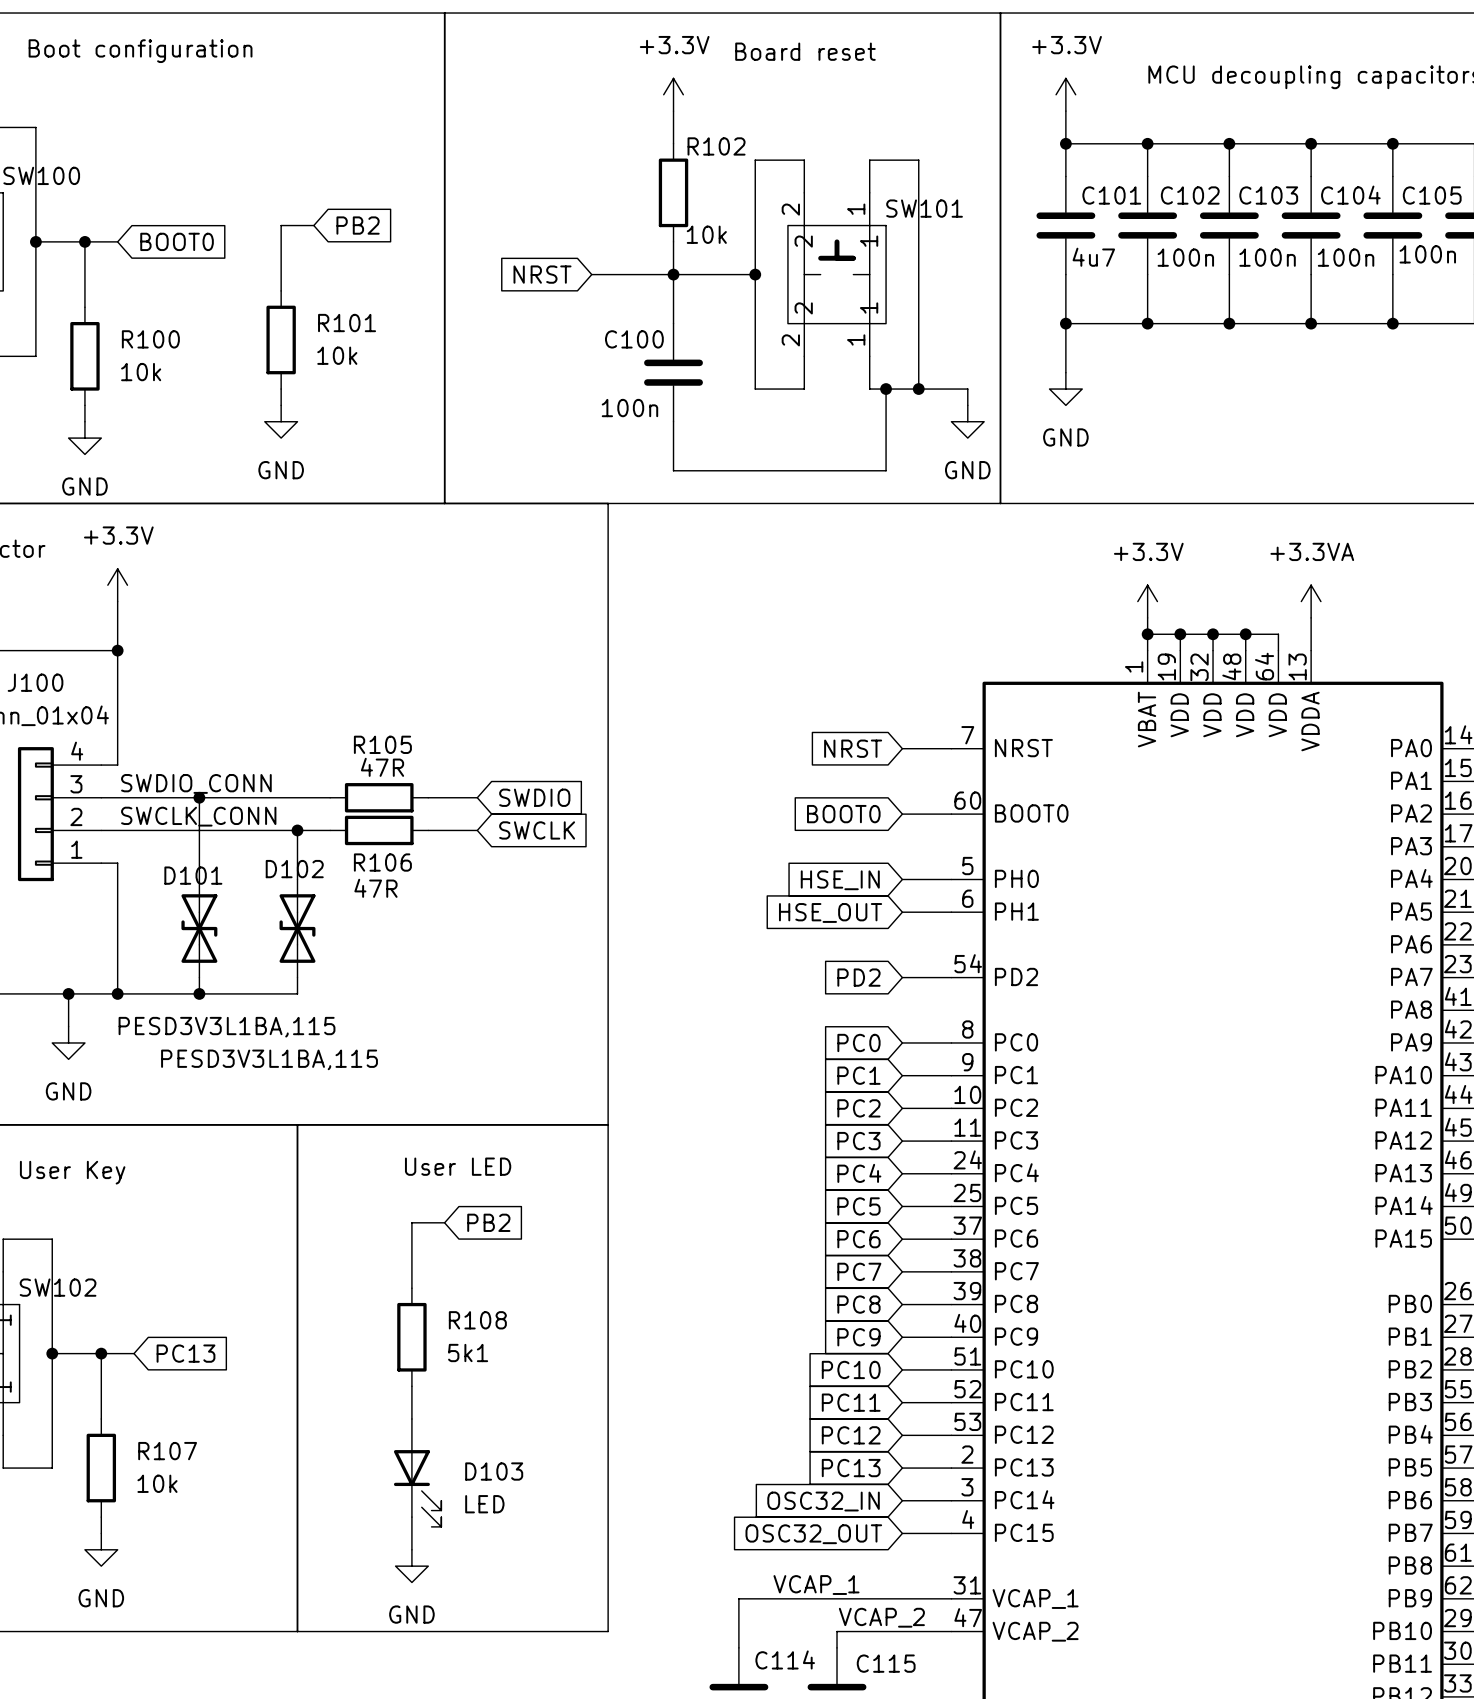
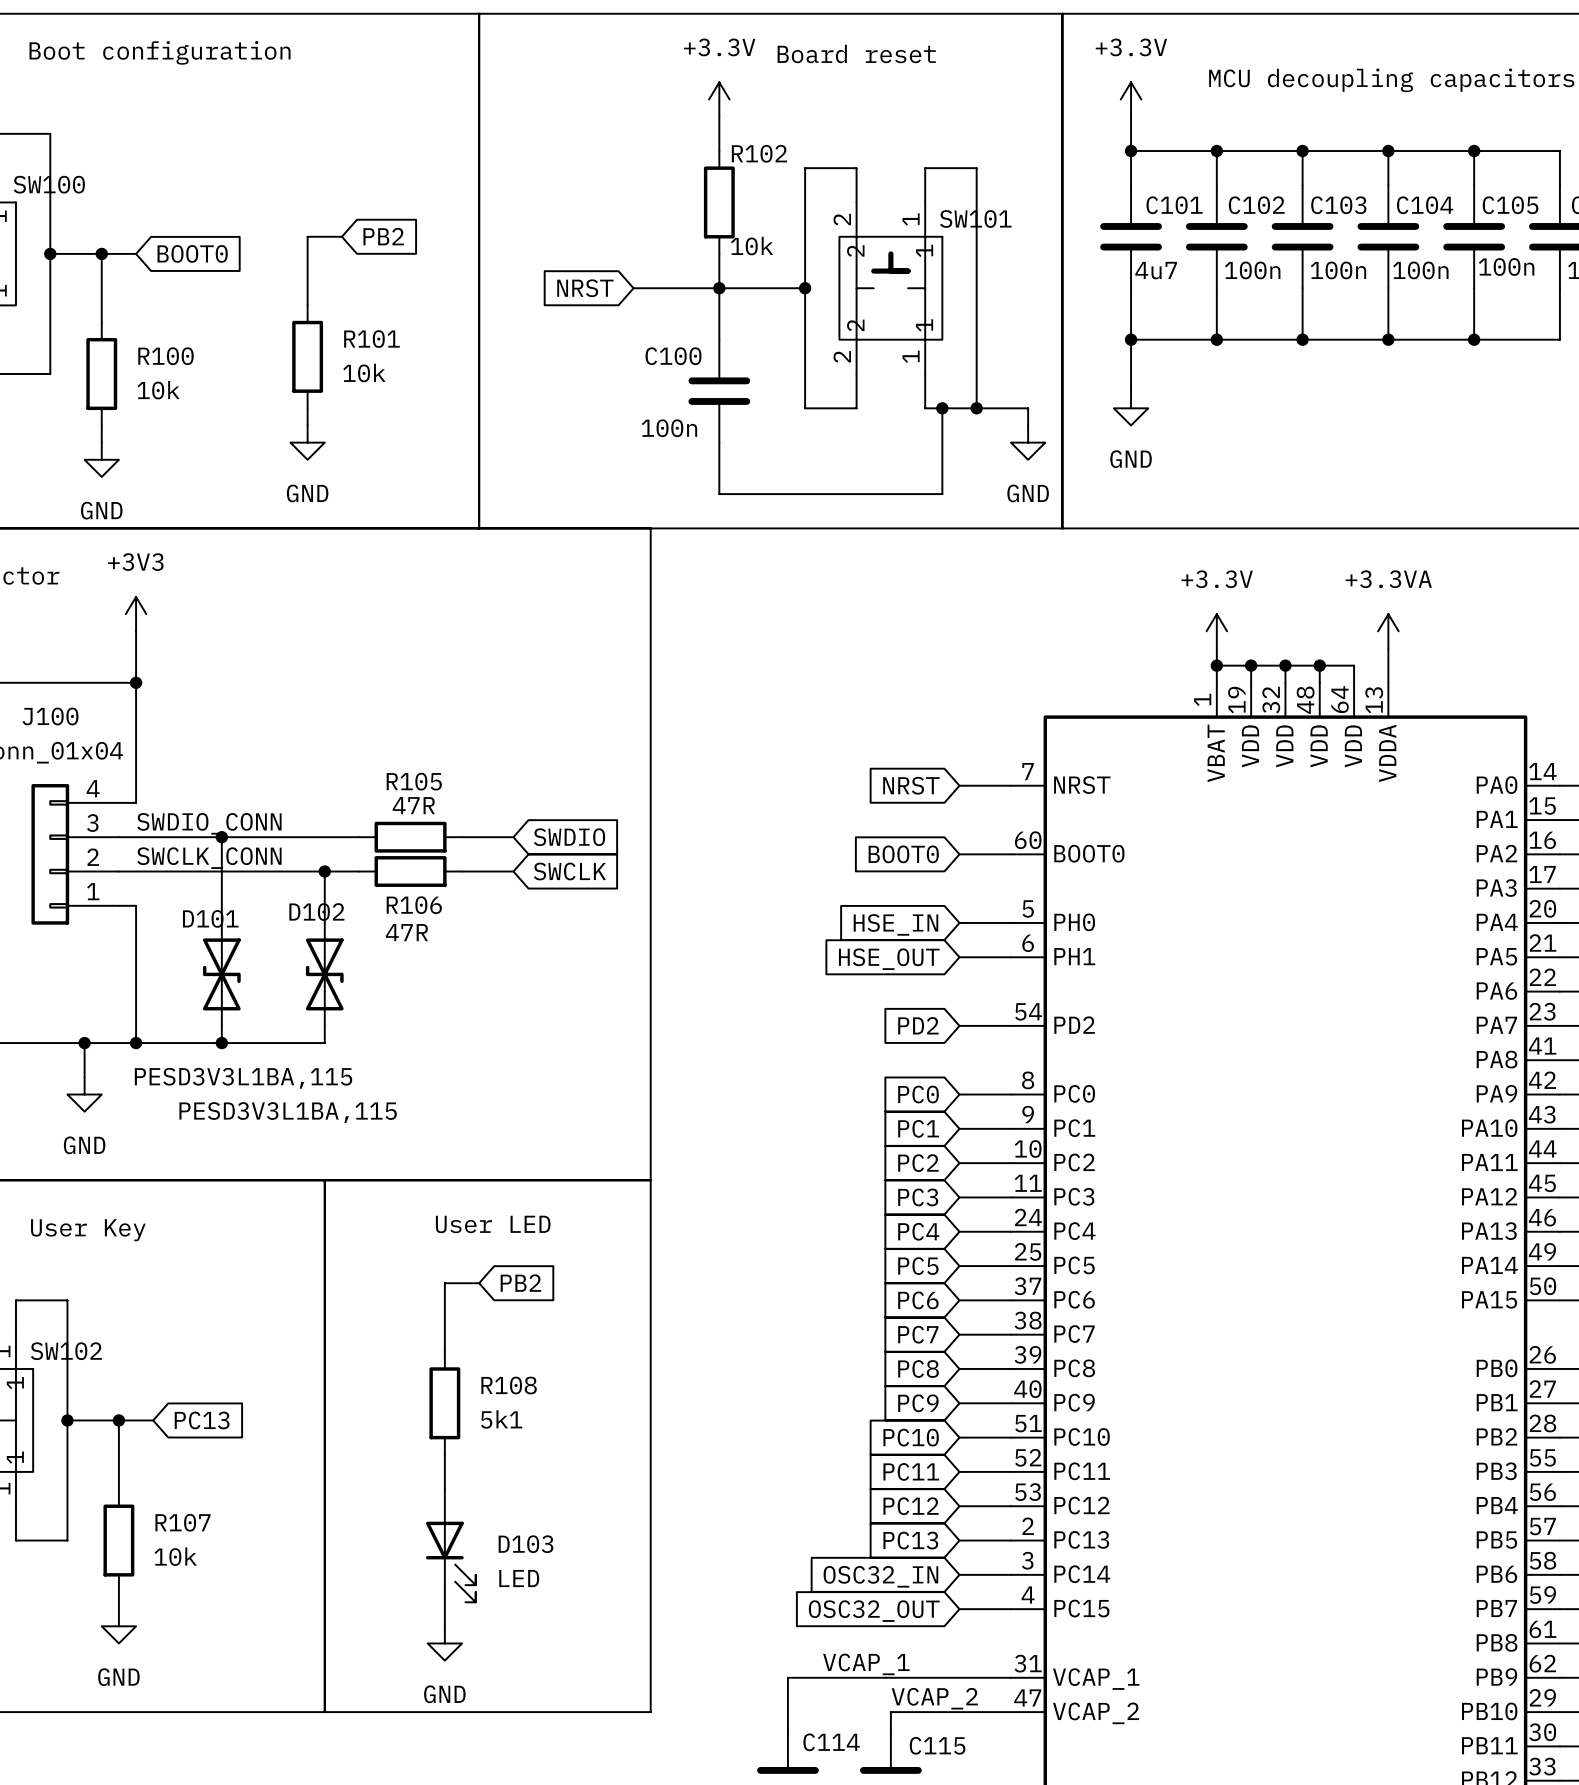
power symbol: +3.3V (117, 585) -> +3V3 (136, 614)

